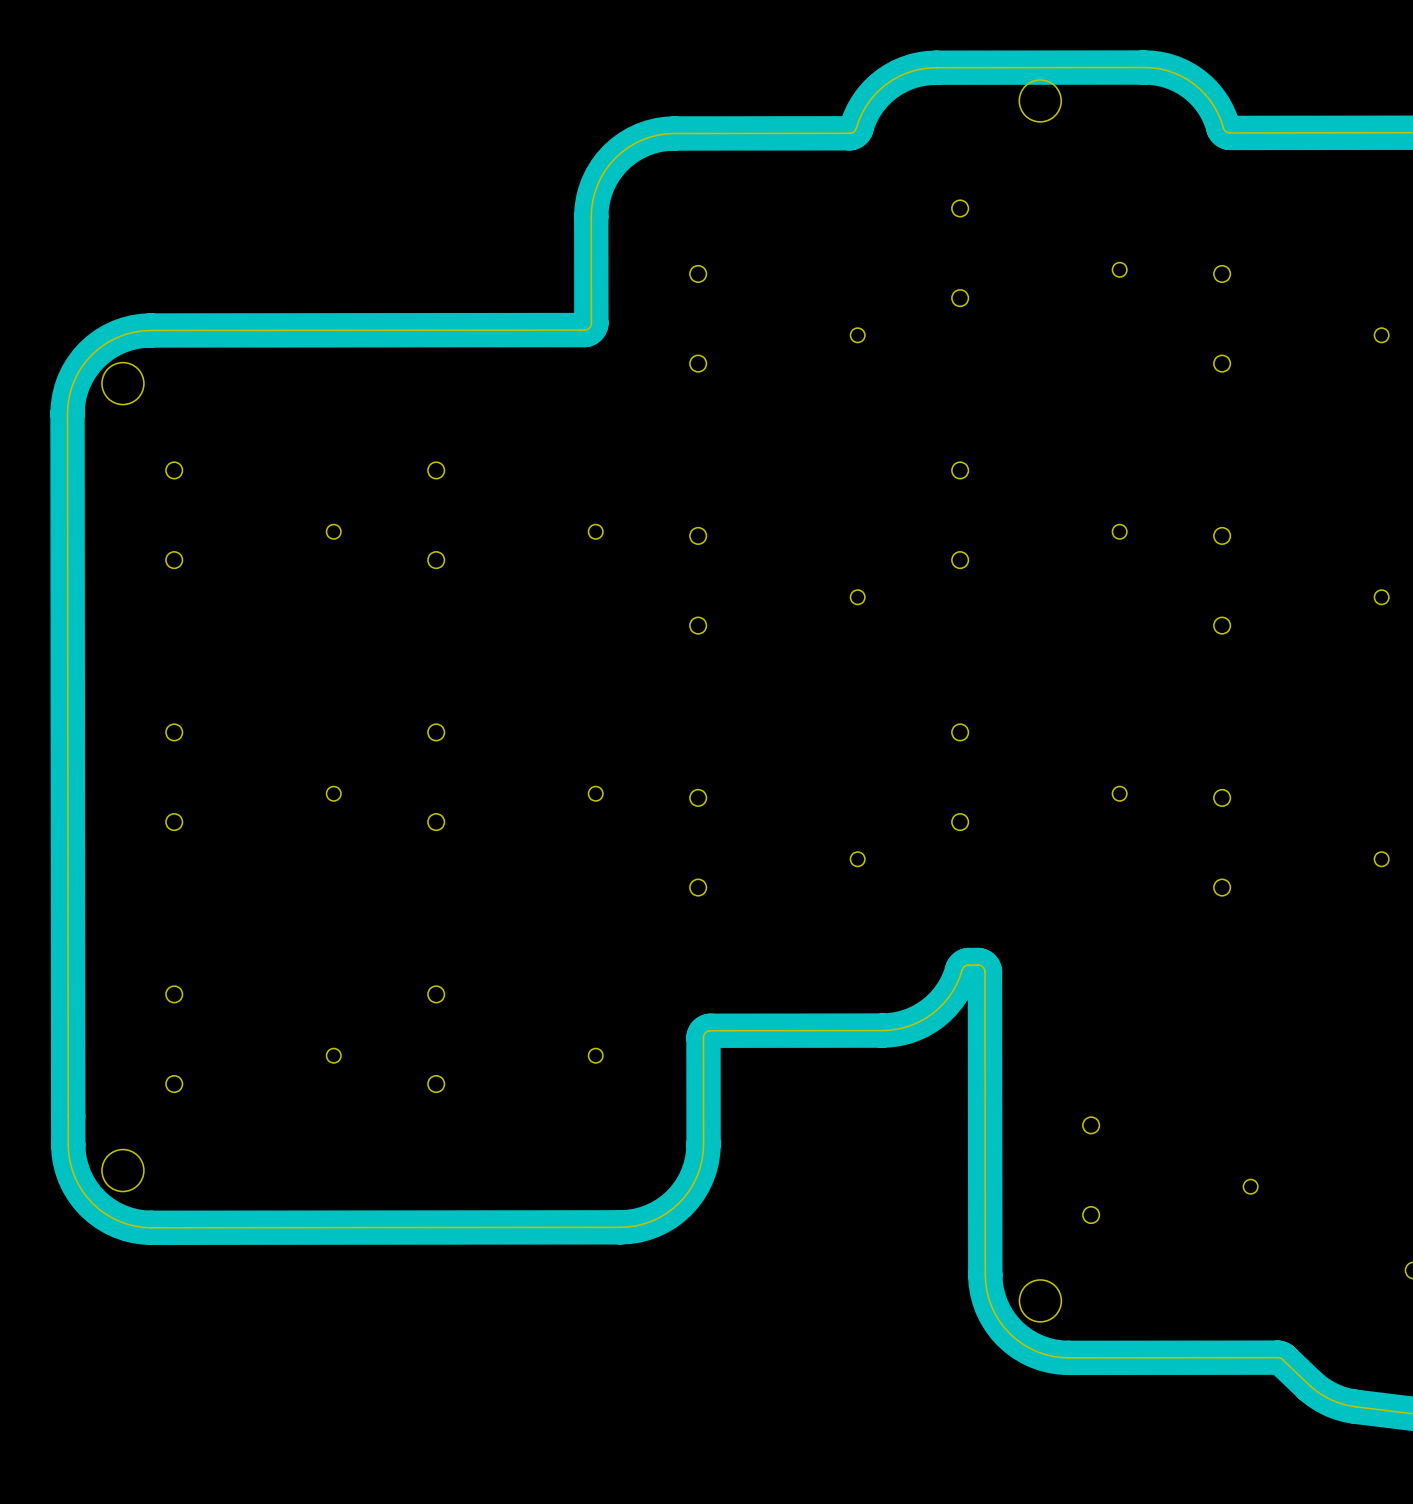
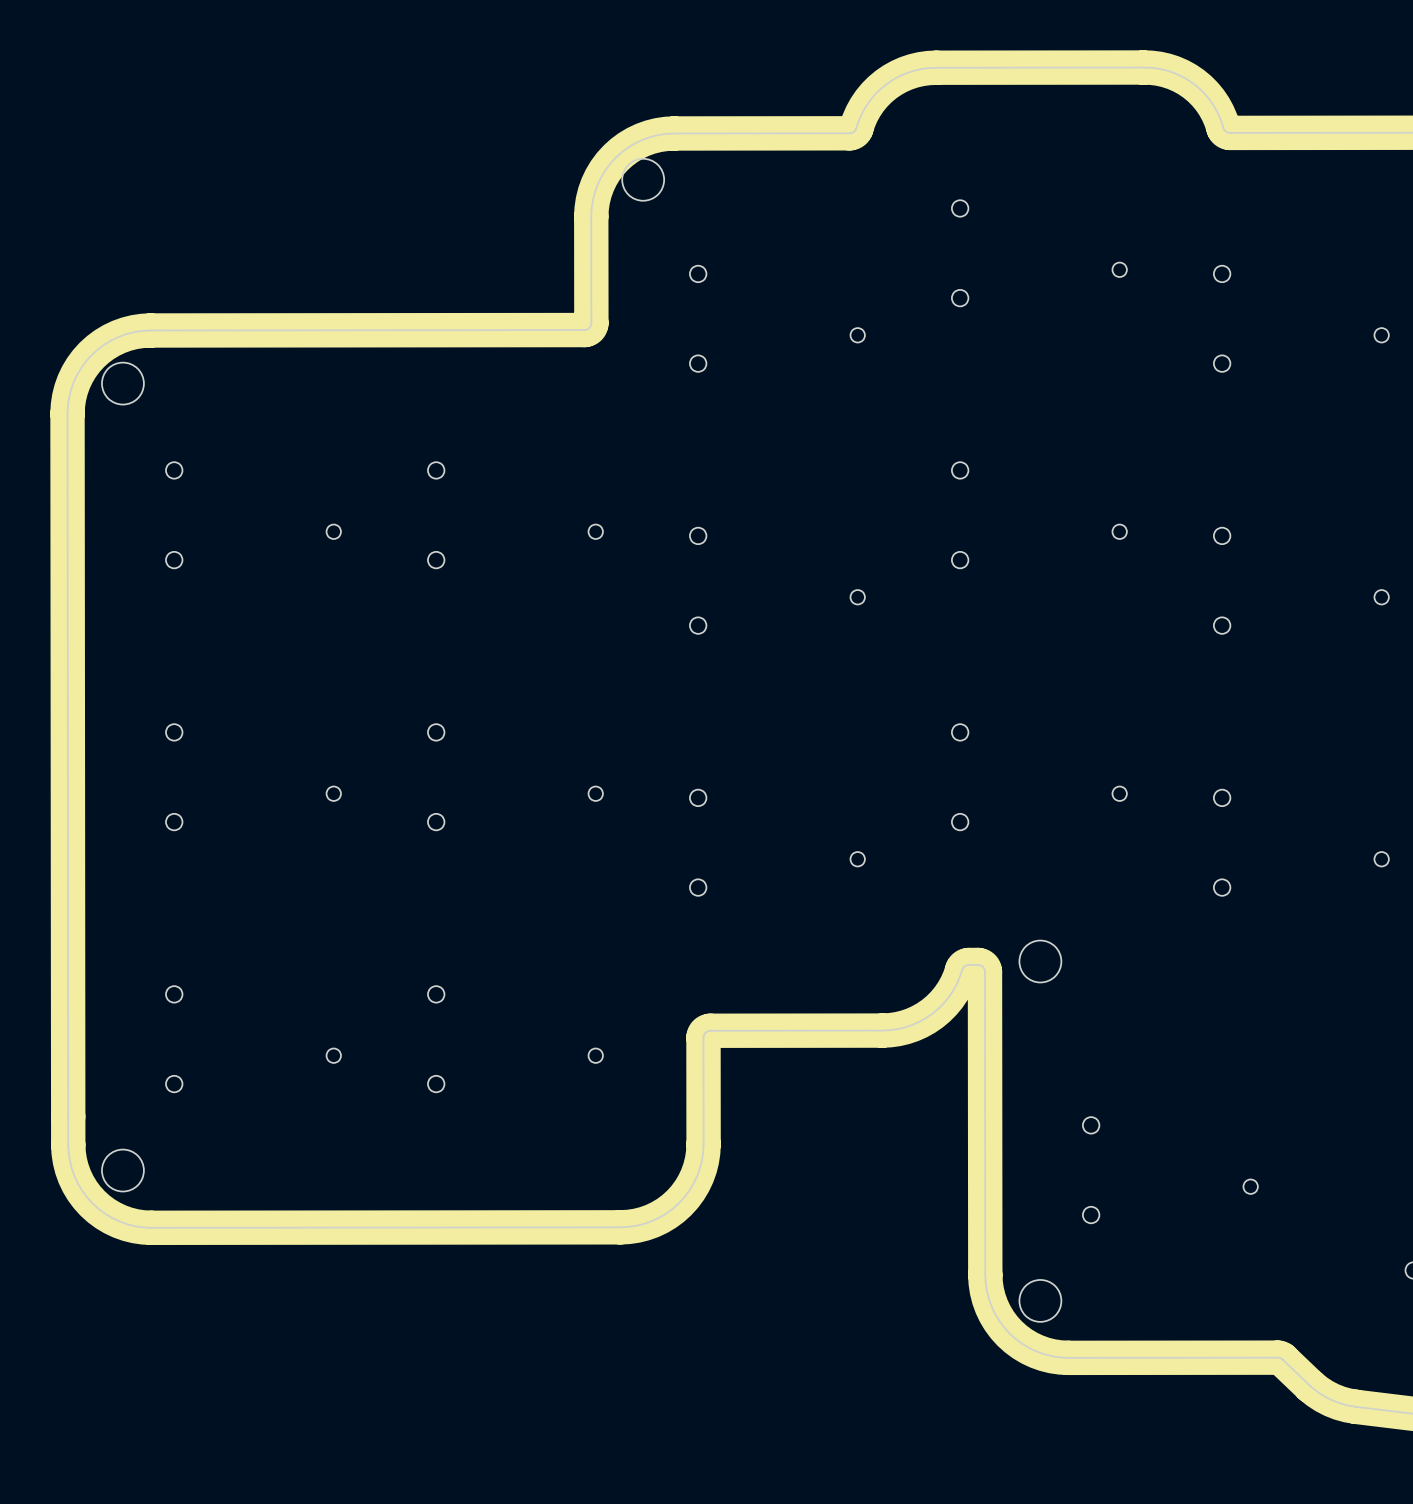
round board edge: [1018, 79, 1062, 123] -> none
round board edge: none -> [621, 158, 665, 202]
round board edge: none -> [1019, 940, 1062, 983]

